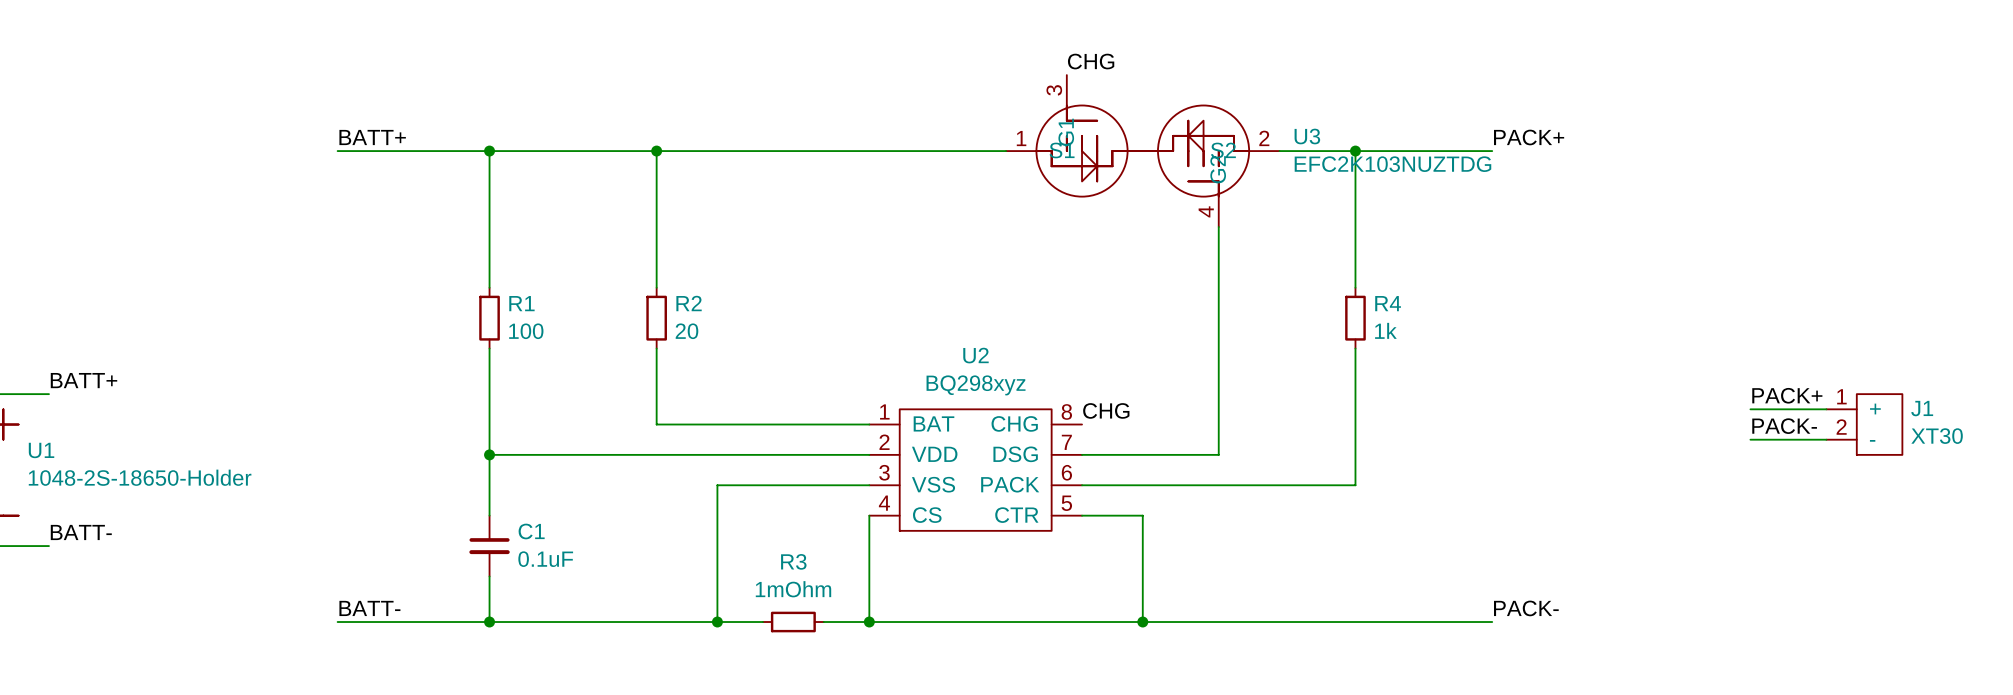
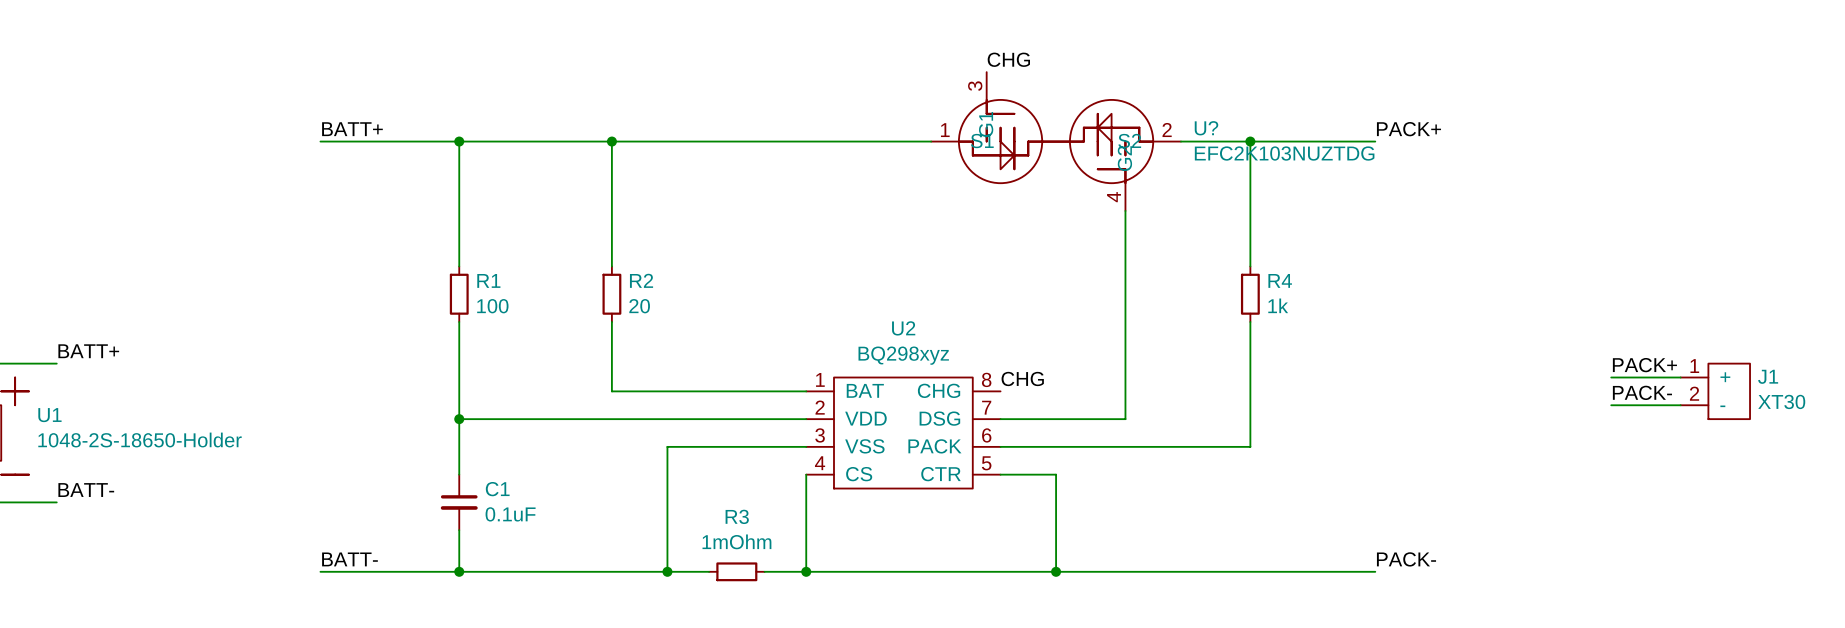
U3 name: U3 (1307, 136) -> U? (1206, 128)

